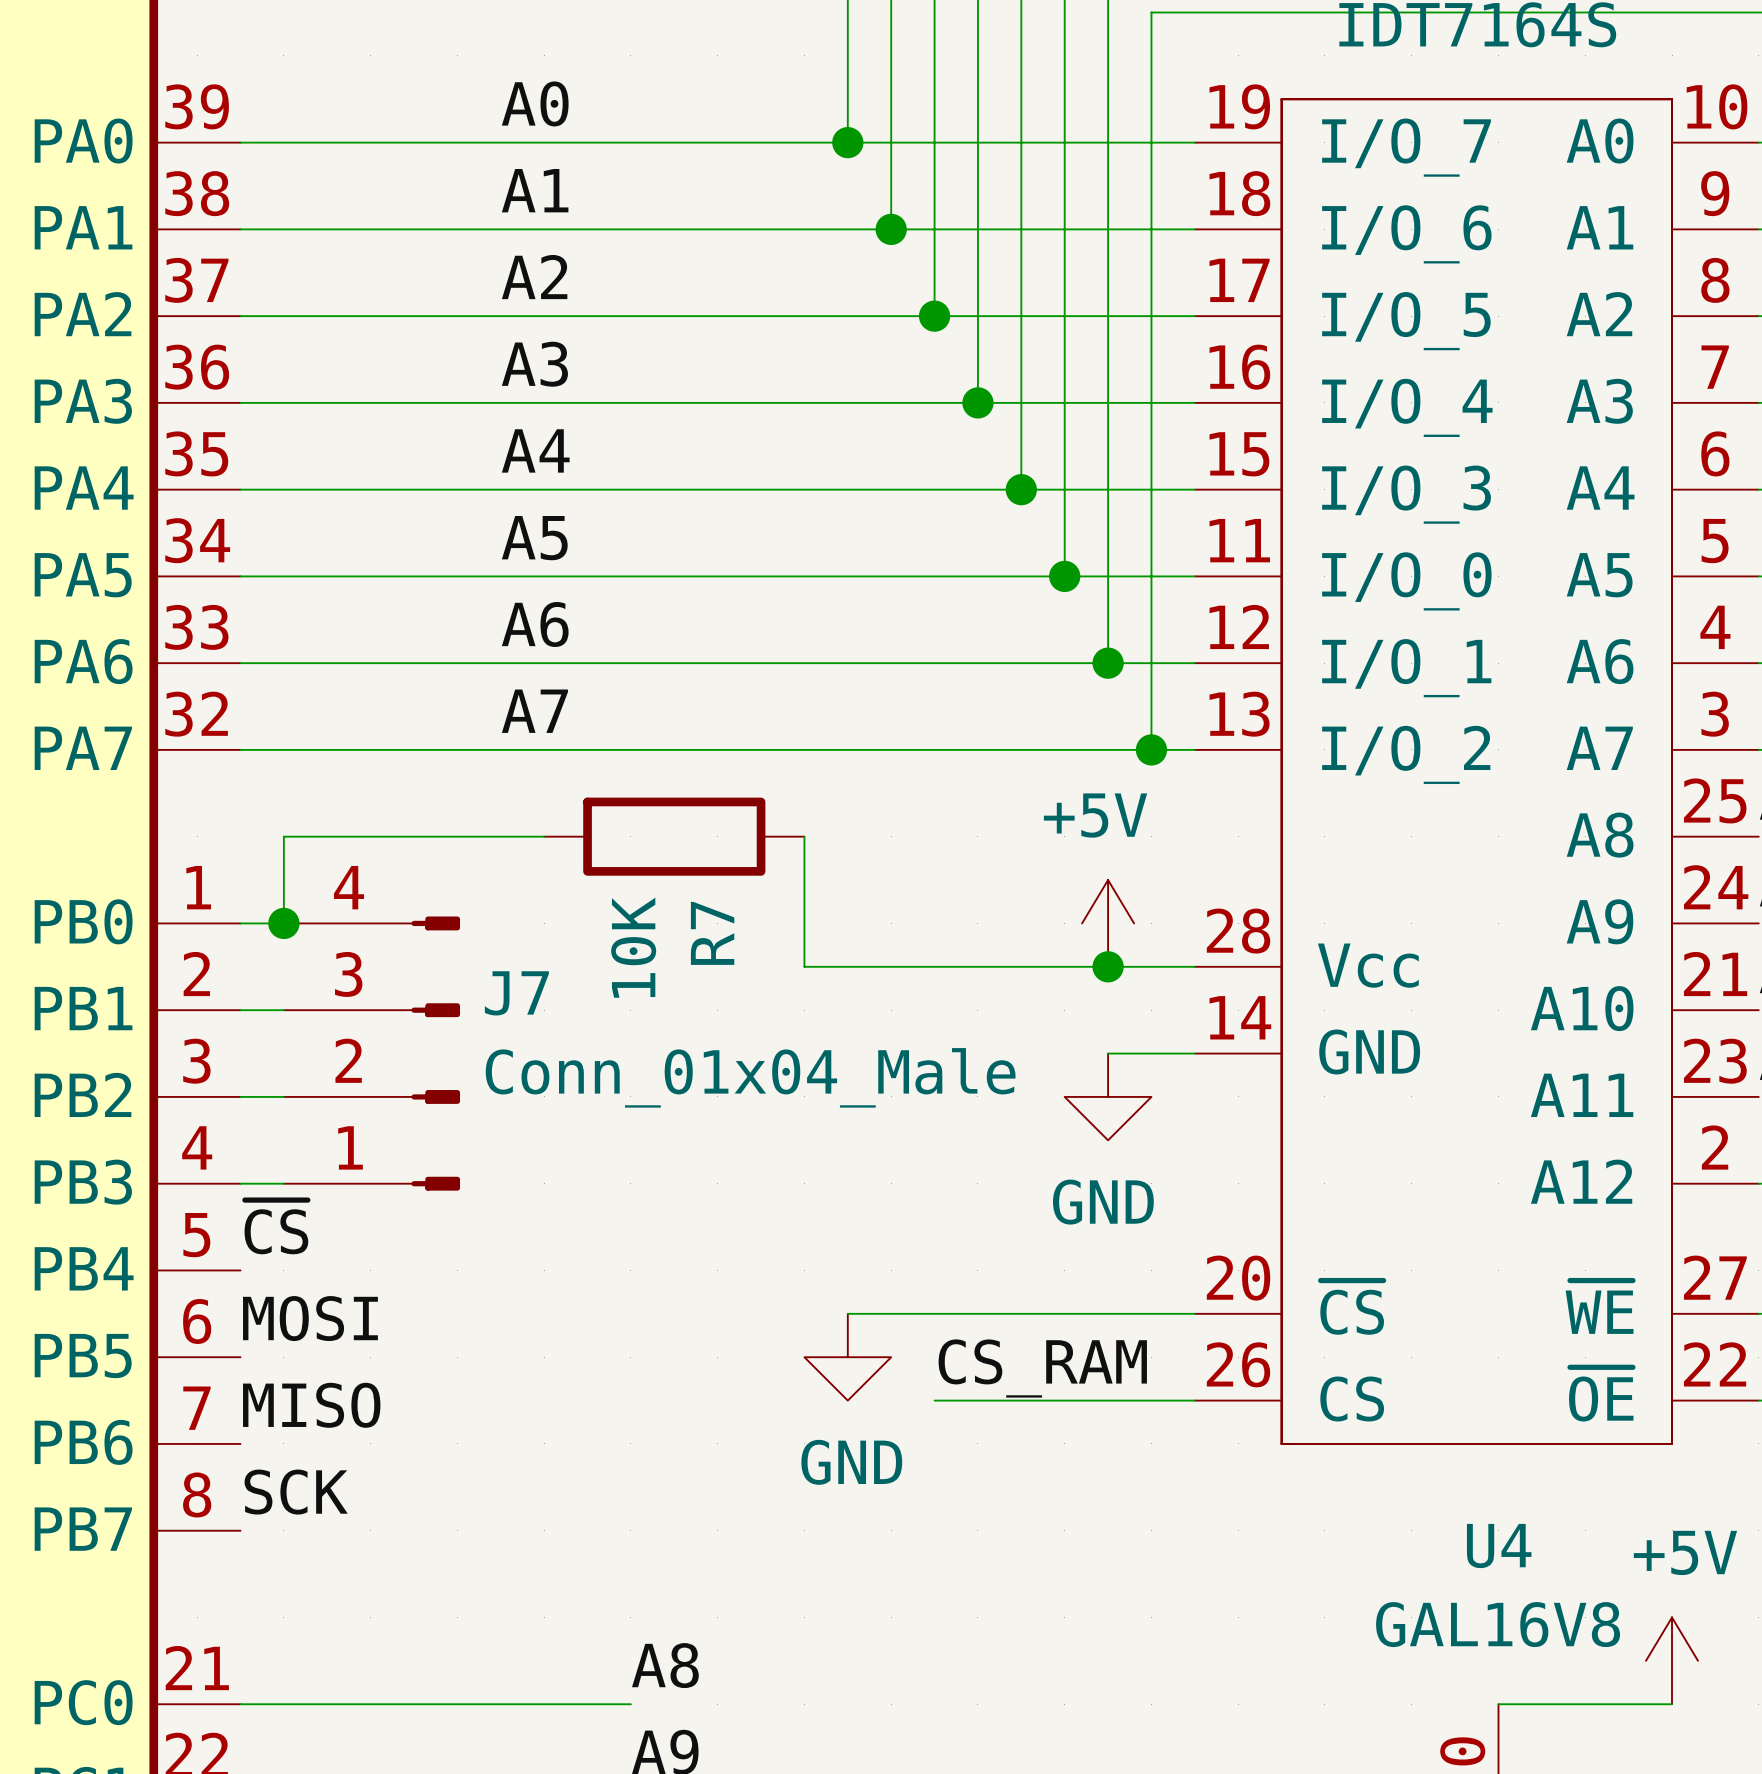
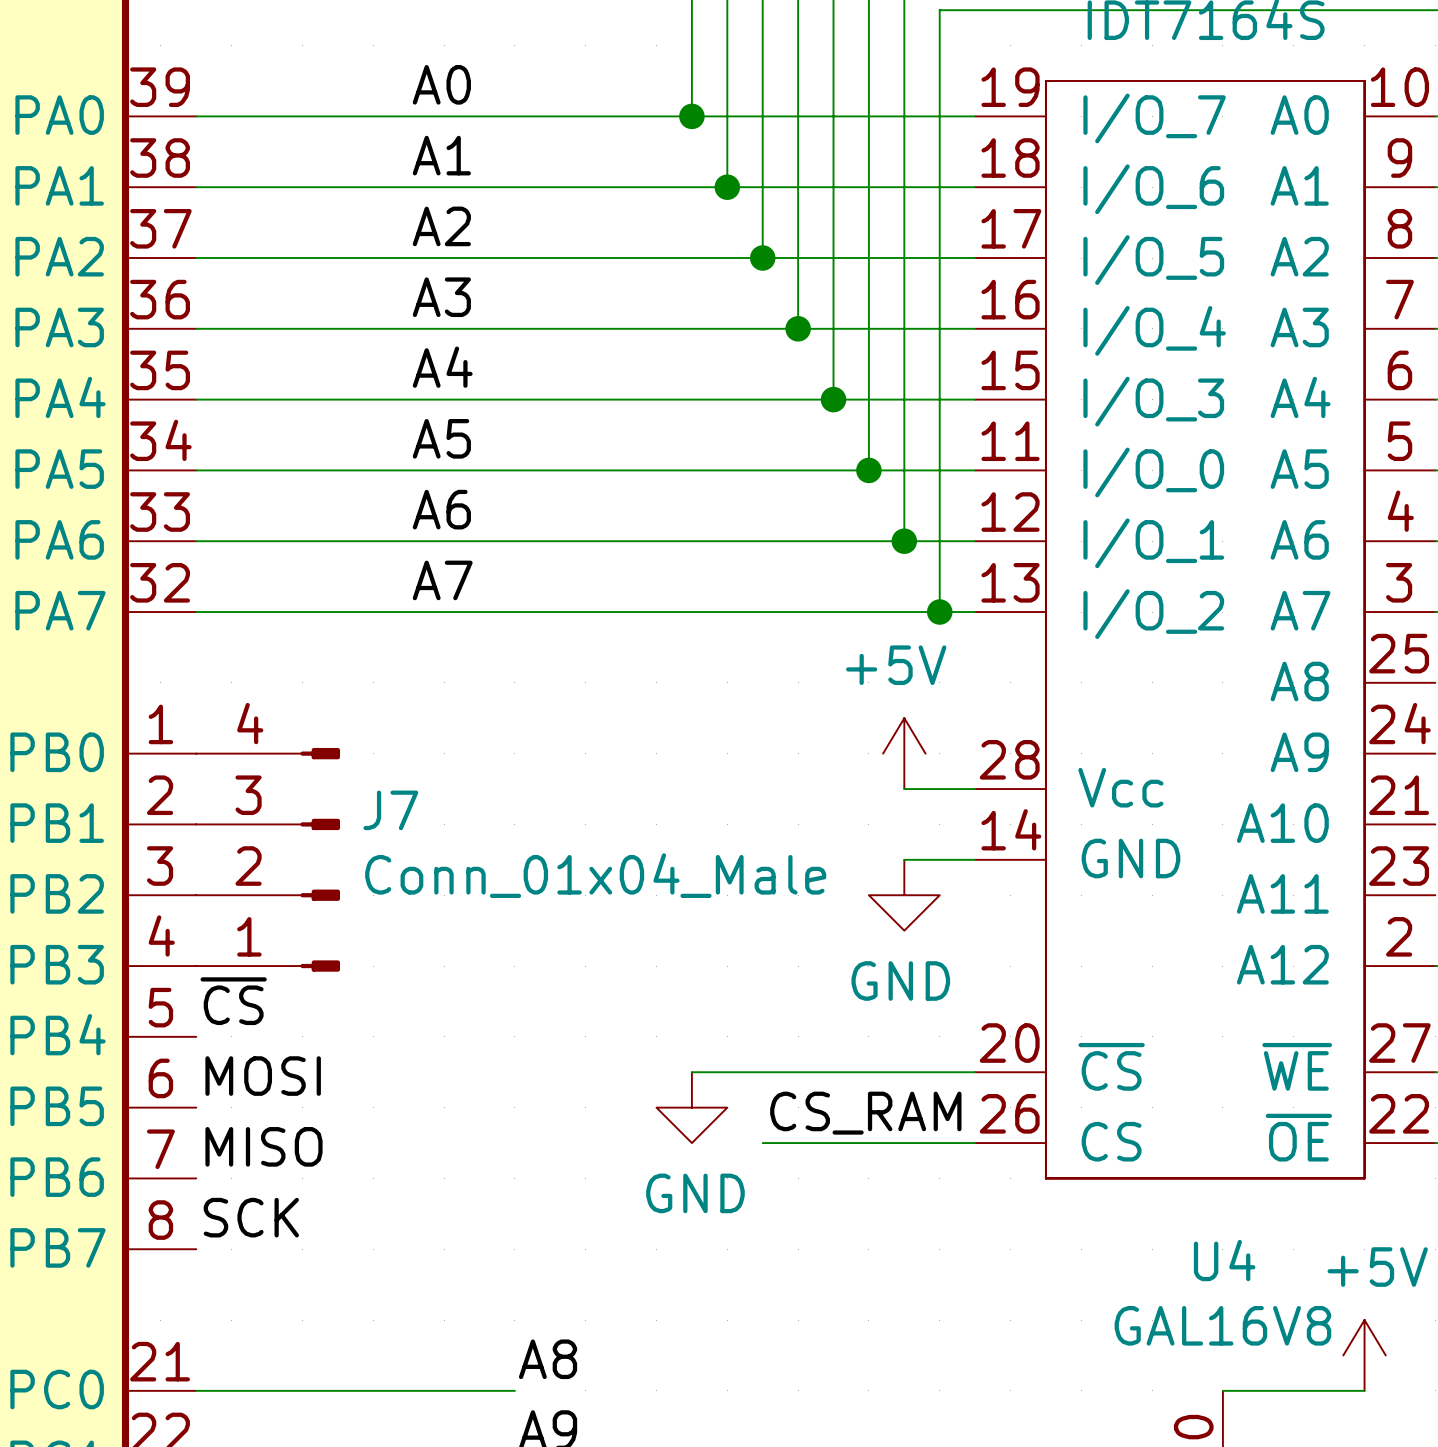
wire: (544, 836) (283, 836) (283, 923) (240, 923) -> none
R7: 10K (674, 836) -> none
wire: (804, 836) (804, 966) (1108, 966) -> none
junction: (283, 923) -> none
junction: (1108, 966) -> none
J7 position: (371, 1053) -> (268, 859)

